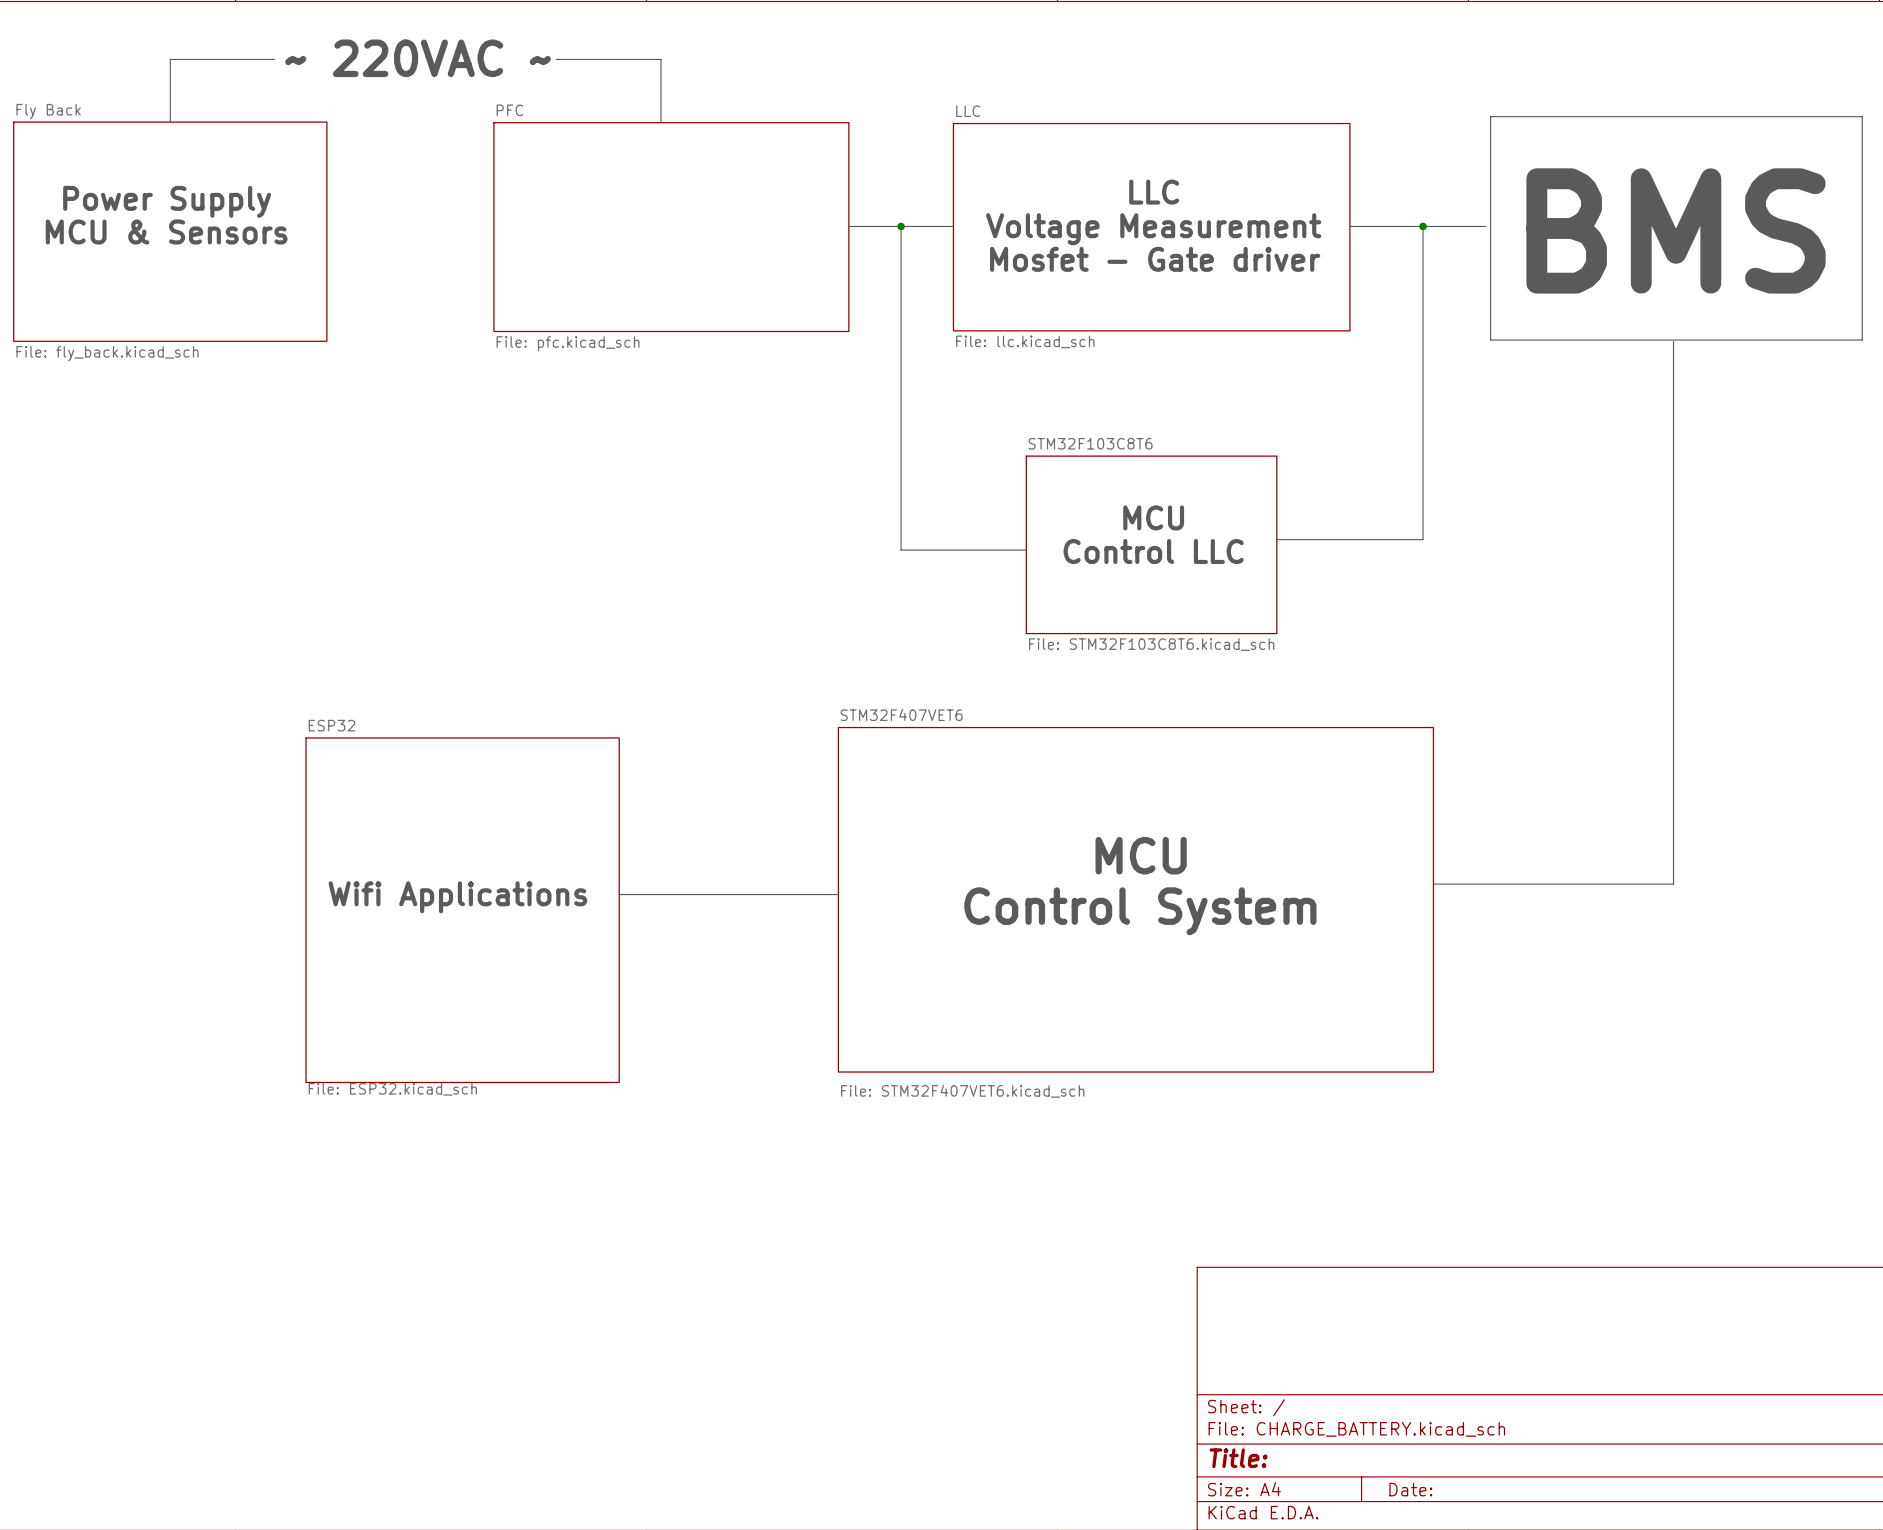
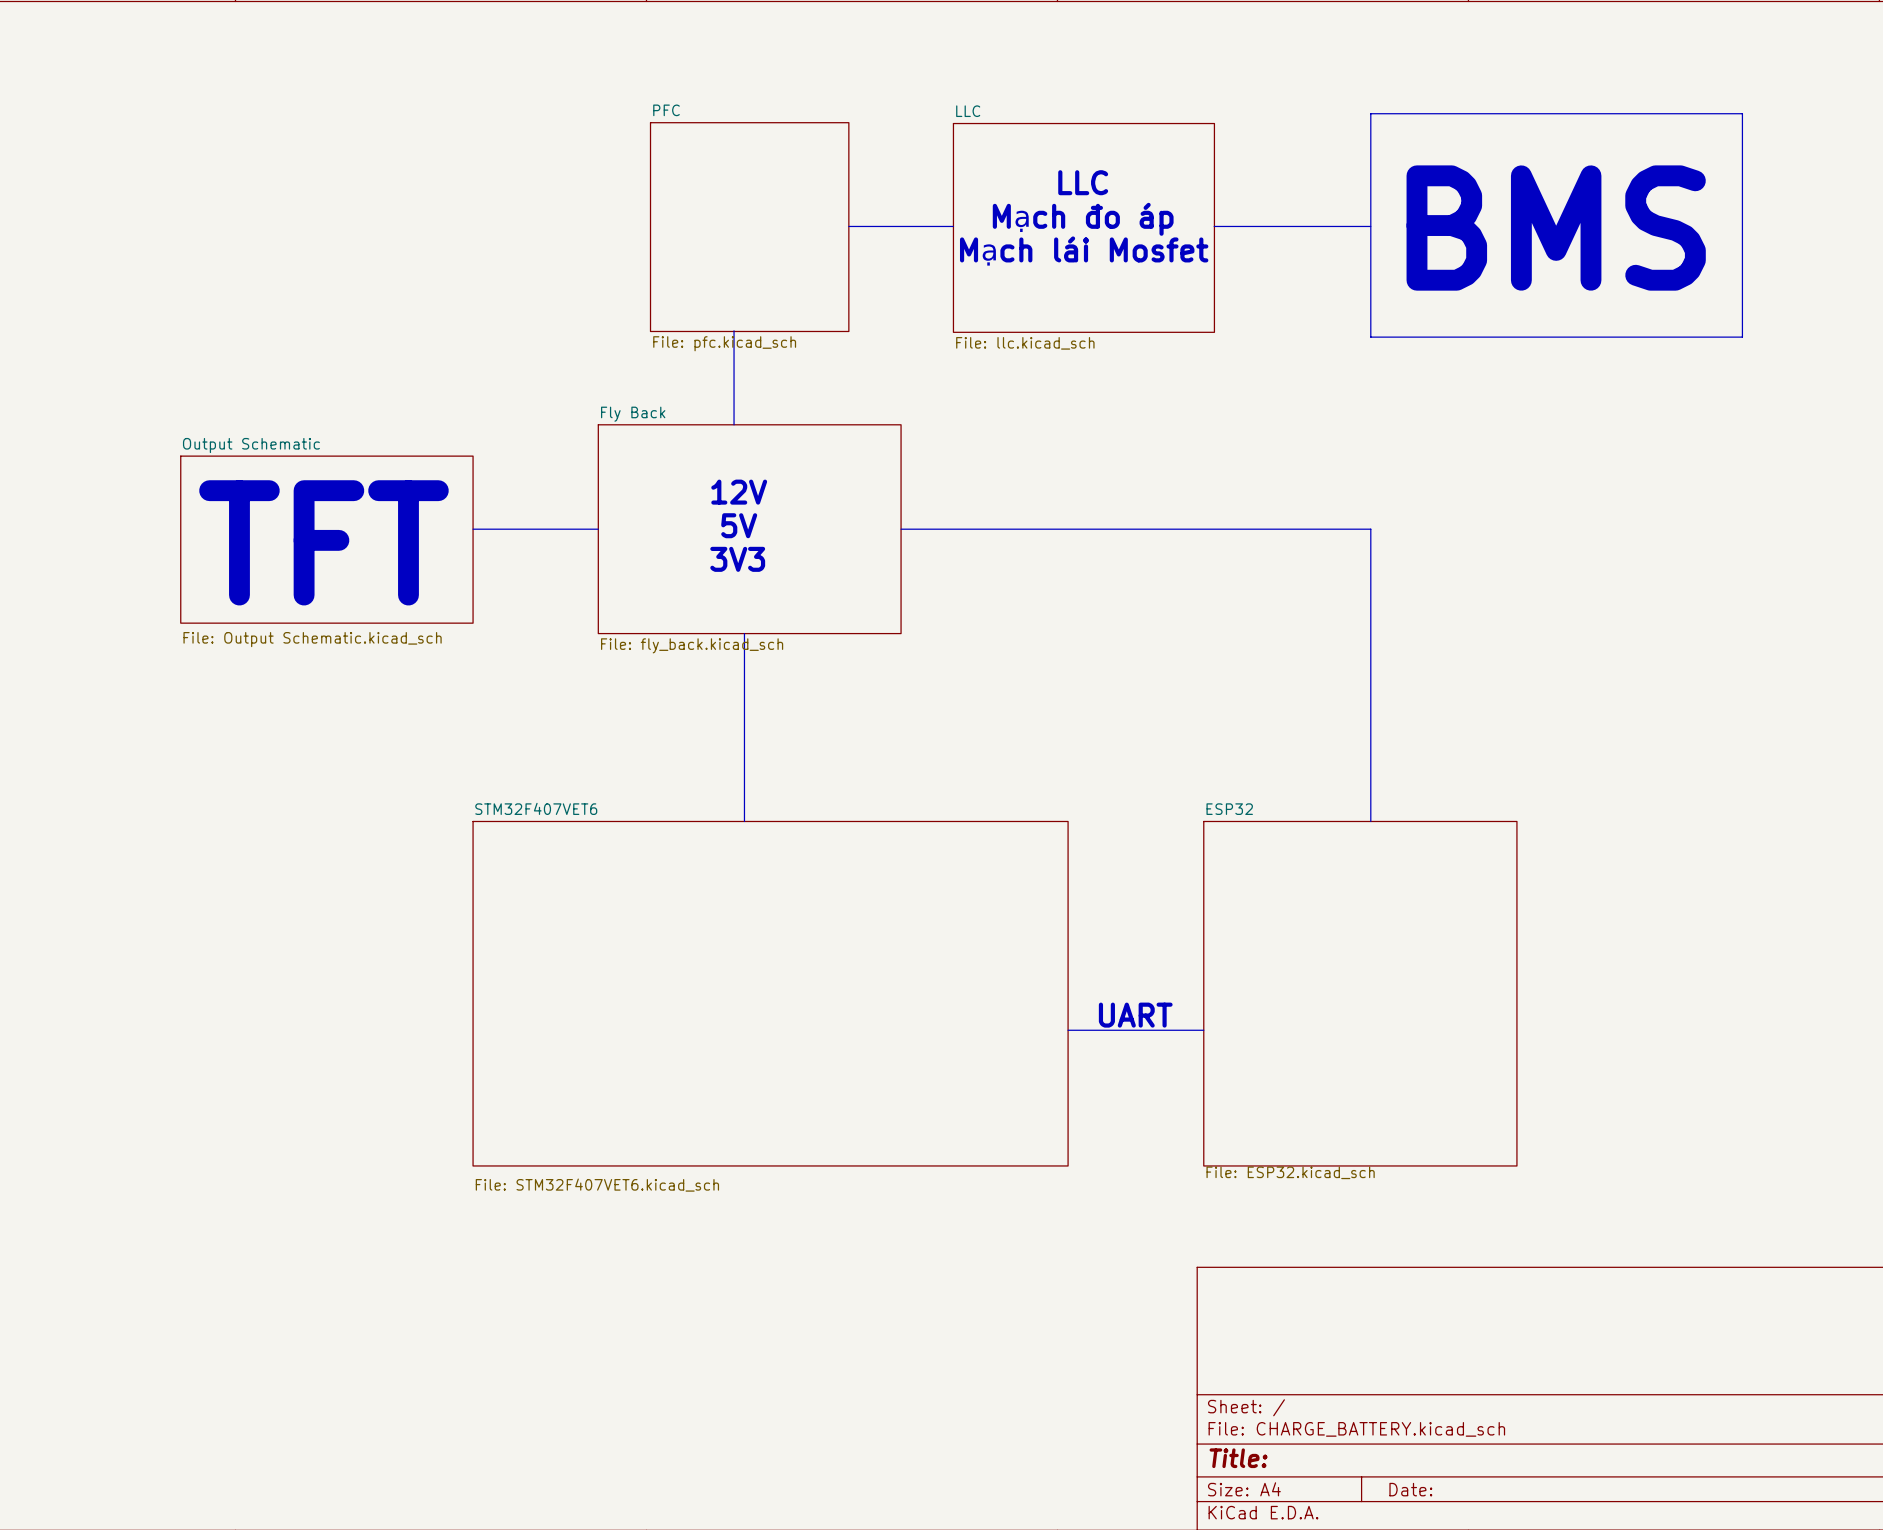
text: ~ 220VAC ~ (418, 58) -> none
bus: (274, 59) (170, 59) (170, 122) -> none
bus: (556, 59) (660, 59) (660, 122) -> none
line: (1490, 116) (1862, 116) (1862, 340) (1490, 340) (1490, 116) -> (1370, 113) (1742, 113) (1742, 337) (1370, 337) (1370, 113)
text position: LLC (1154, 192) -> LLC (1083, 182)
text: Power Supply (167, 201) -> none
text: none -> Mạch đo áp (1083, 219)
bus: (901, 226) (901, 550) (1026, 550) -> none
junction: (901, 226) -> none
bus: none -> (1214, 226) (1349, 226)
bus: (1370, 226) (1485, 226) -> none
bus: (1422, 226) (1422, 539) (1276, 539) -> none
junction: (1422, 226) -> none
sheet PFC: File: pfc.kicad_sch (671, 227) -> none
sheet PFC: none -> File: pfc.kicad_sch (749, 227)
sheet LLC: none -> File: llc.kicad_sch (1083, 227)
sheet LLC: File: llc.kicad_sch (1151, 227) -> none
text: Voltage Measurement (1153, 229) -> none
text position: BMS (1676, 230) -> BMS (1556, 228)
text: MCU & Sensors (166, 231) -> none
sheet Fly Back: File: fly_back.kicad_sch (170, 231) -> none
text: none -> Mạch lái Mosfet (1084, 252)
text: Mosfet - Gate driver (1155, 259) -> none
bus: none -> (734, 330) (734, 424)
bus: (1673, 341) (1673, 884) (1433, 884) -> none
text: none -> 12V (739, 492)
text: MCU (1153, 517) -> none
text: none -> 5V (739, 525)
bus: none -> (473, 529) (598, 529)
sheet Fly Back: none -> File: fly_back.kicad_sch (749, 529)
bus: none -> (901, 529) (1370, 529) (1370, 821)
sheet Output Schematic: none -> File: Output Schematic.kicad_sch (326, 539)
text: none -> TFT (323, 542)
sheet STM32F103C8T6: File: STM32F103C8T6.kicad_sch (1151, 544) -> none
text: Control LLC (1153, 551) -> none
text: none -> 3V3 (737, 559)
bus: none -> (744, 633) (744, 821)
text: MCU (1141, 855) -> none
bus: (619, 894) (838, 894) -> none
text: Wifi Applications (457, 897) -> none
sheet STM32F407VET6 position: (1135, 899) -> (770, 993)
sheet ESP32 position: (462, 910) -> (1360, 993)
text: Control System (1140, 911) -> none
text: none -> UART (1135, 1015)
bus: none -> (1068, 1030) (1203, 1030)

